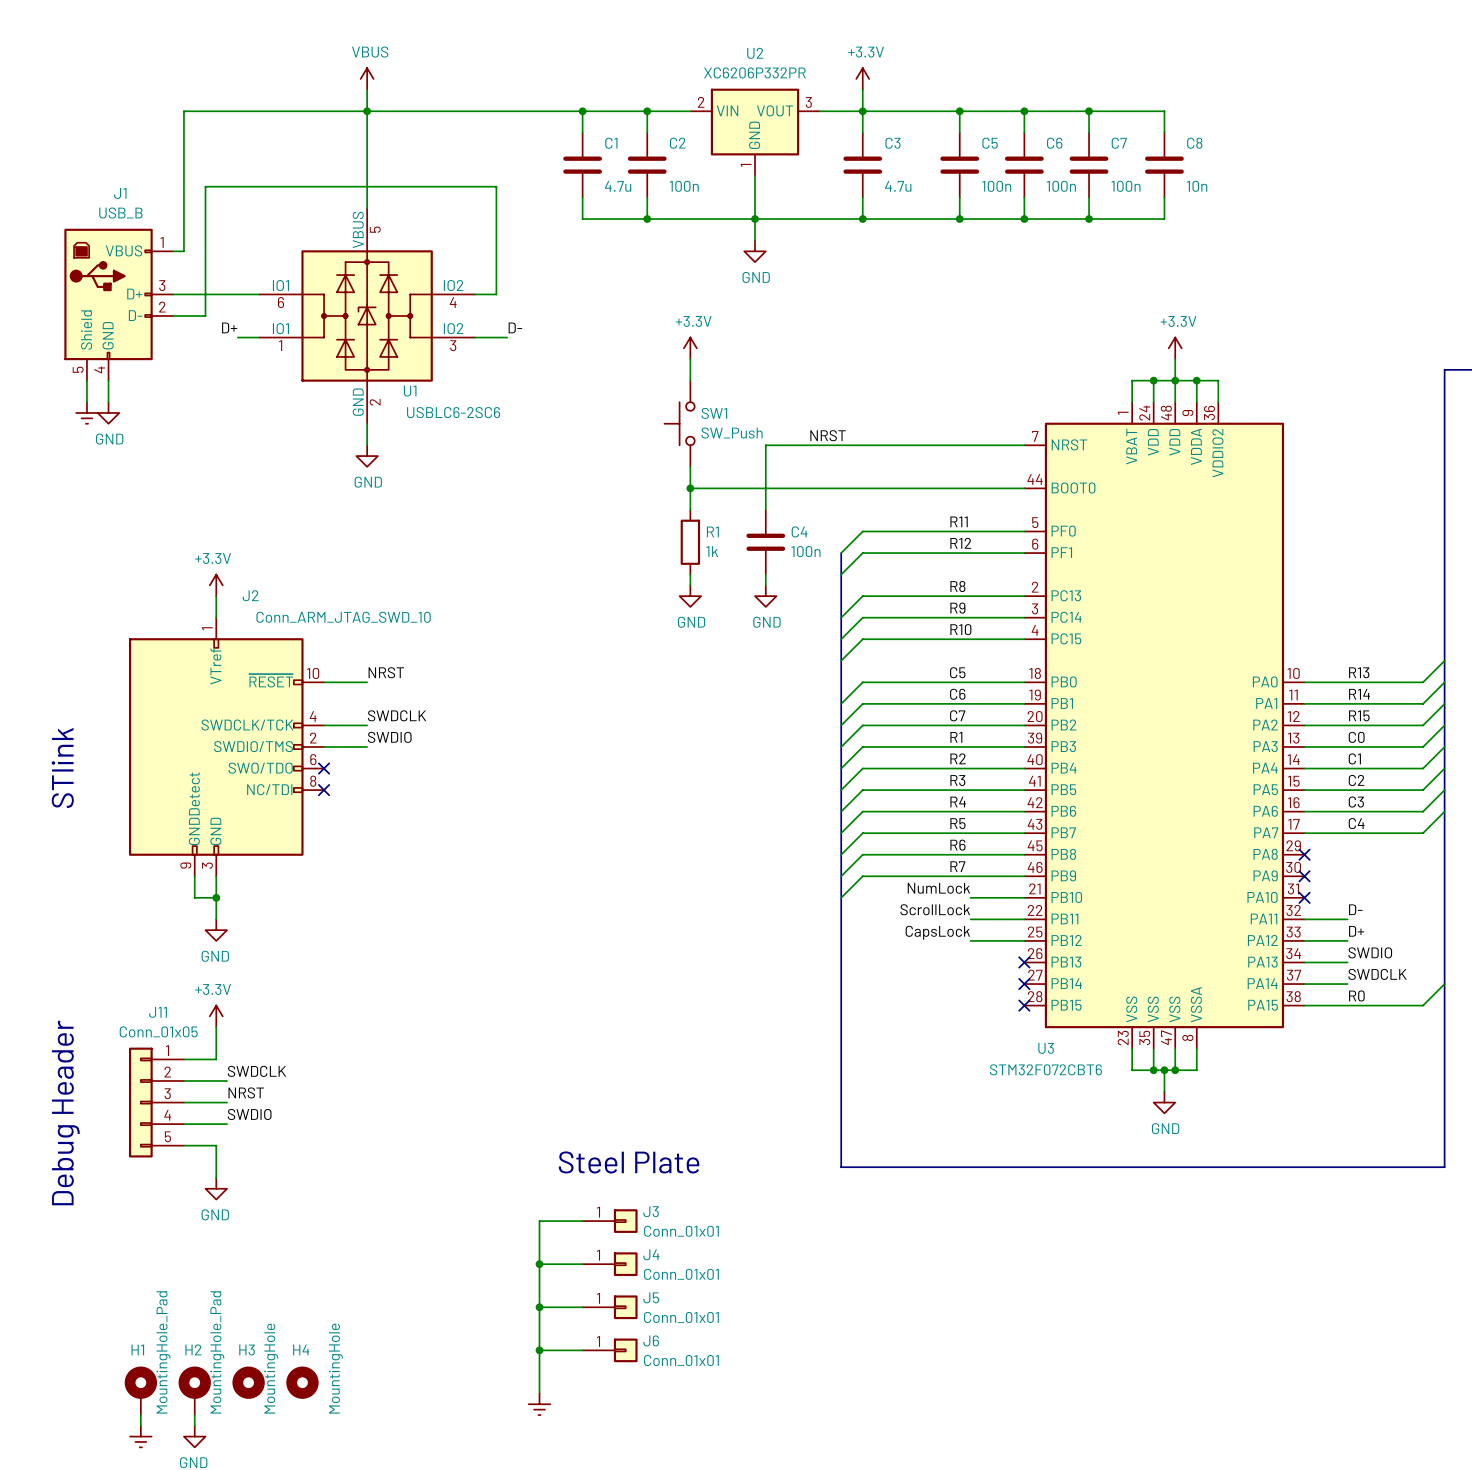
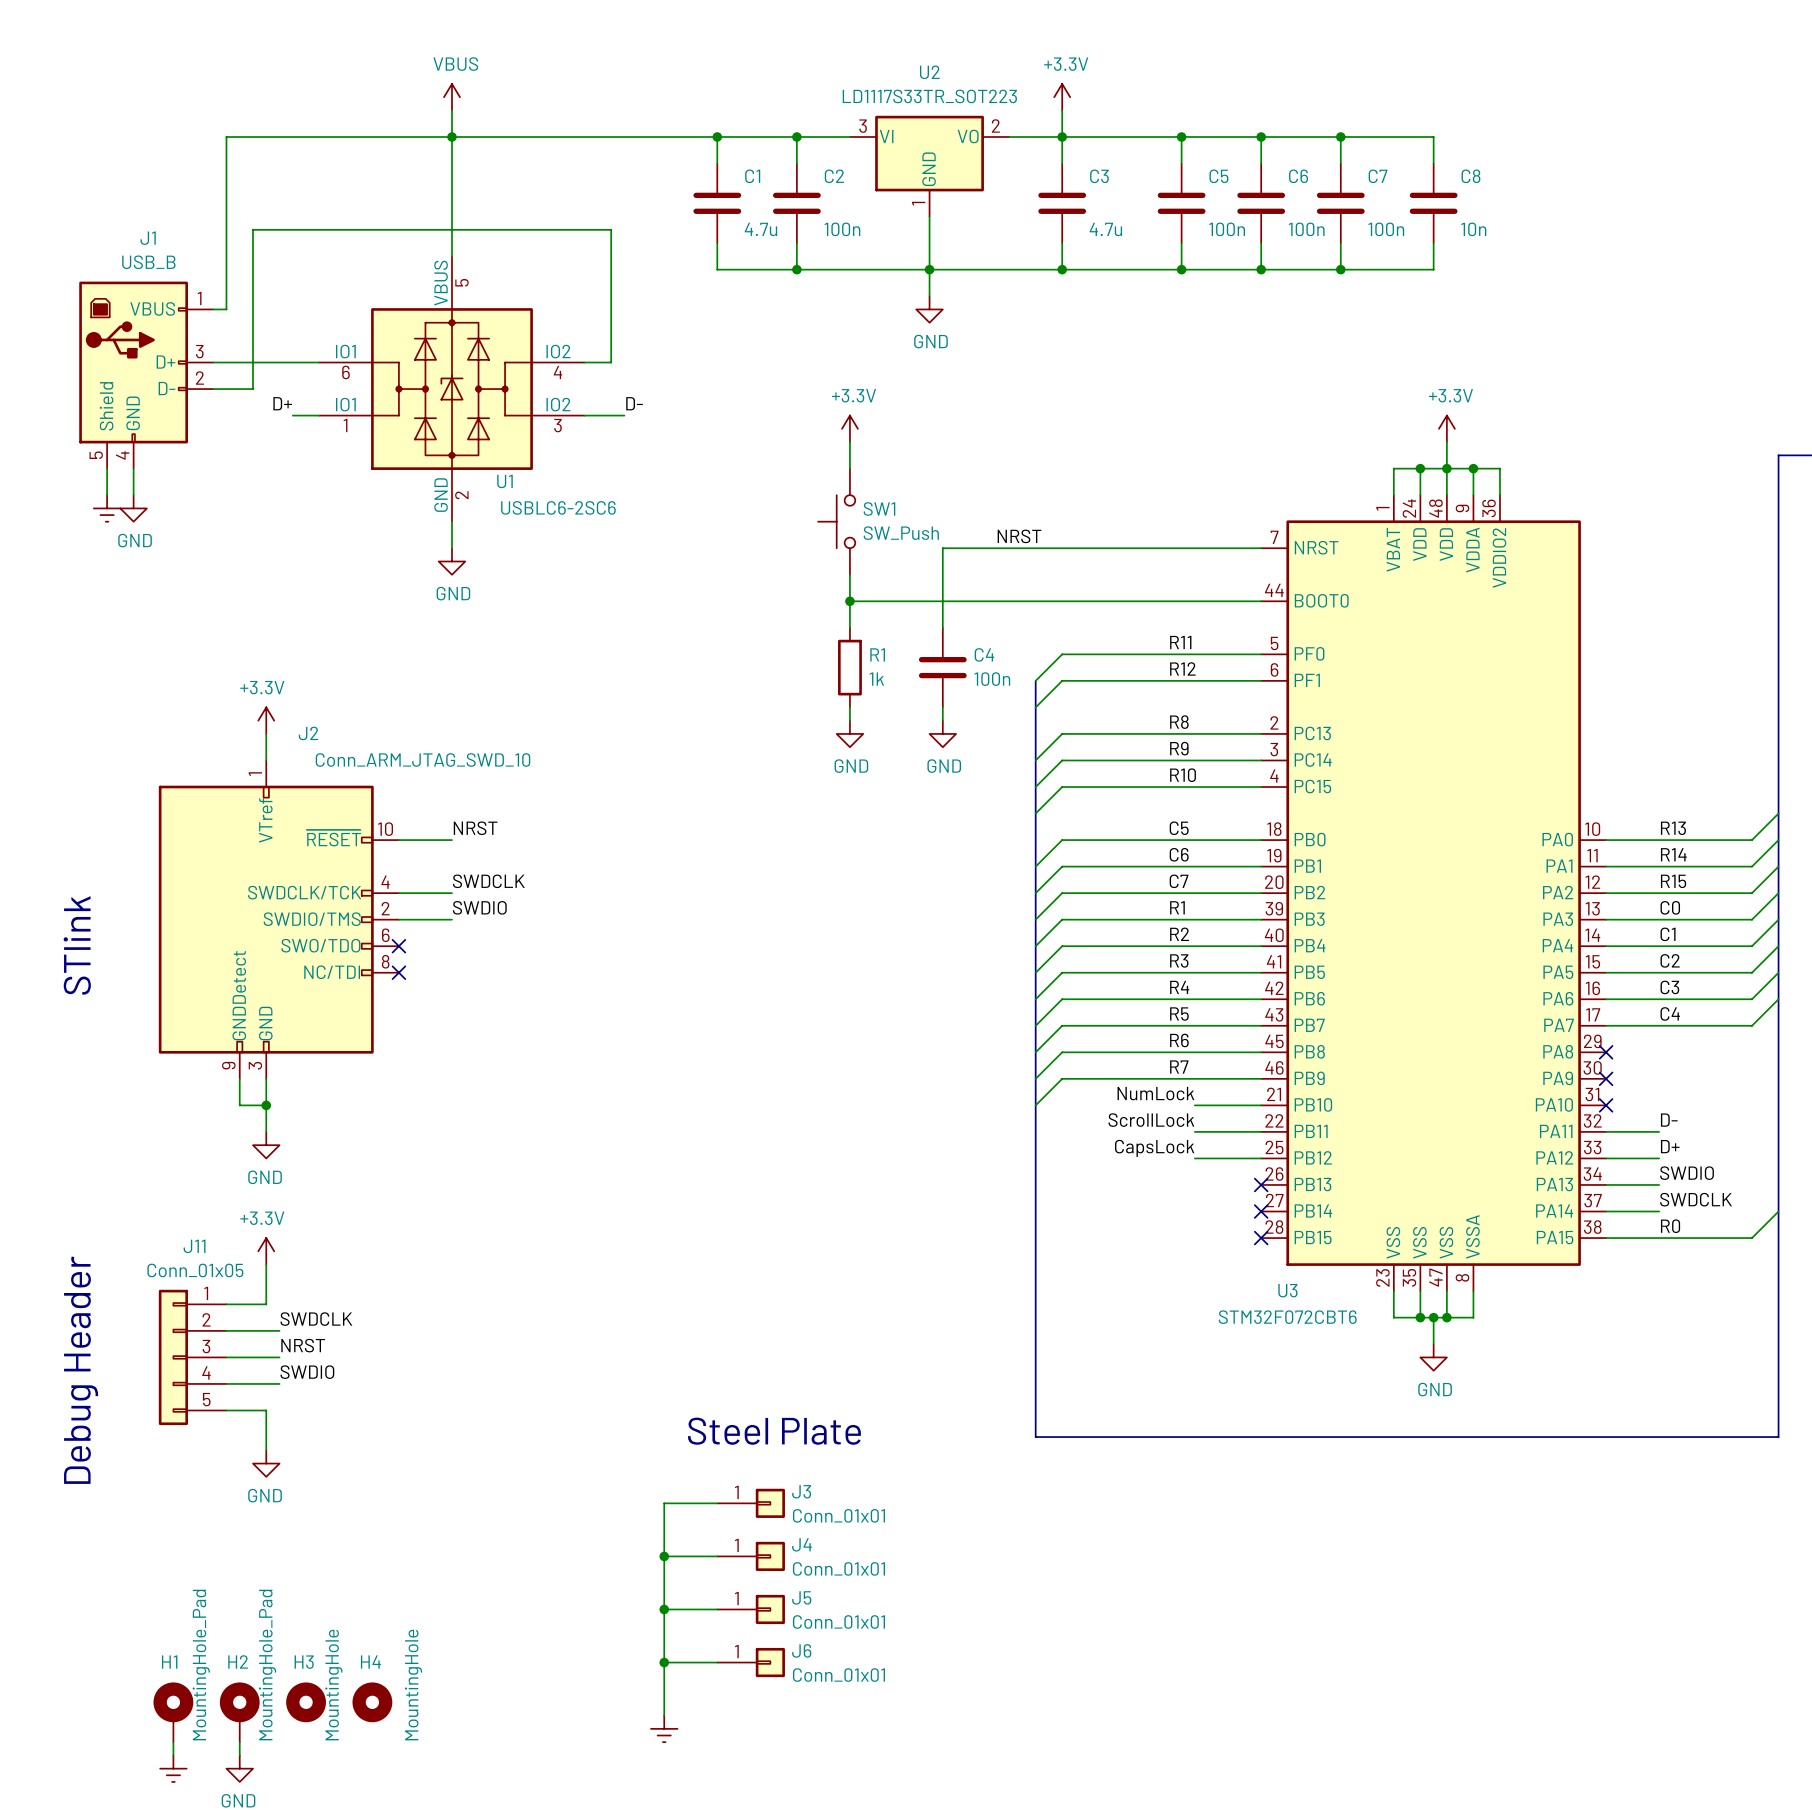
U2 value: XC6206P332PR (754, 72) -> LD1117S33TR_SOT223 (929, 96)
U2 symbol: [690, 88, 820, 176] -> [849, 115, 1010, 217]

